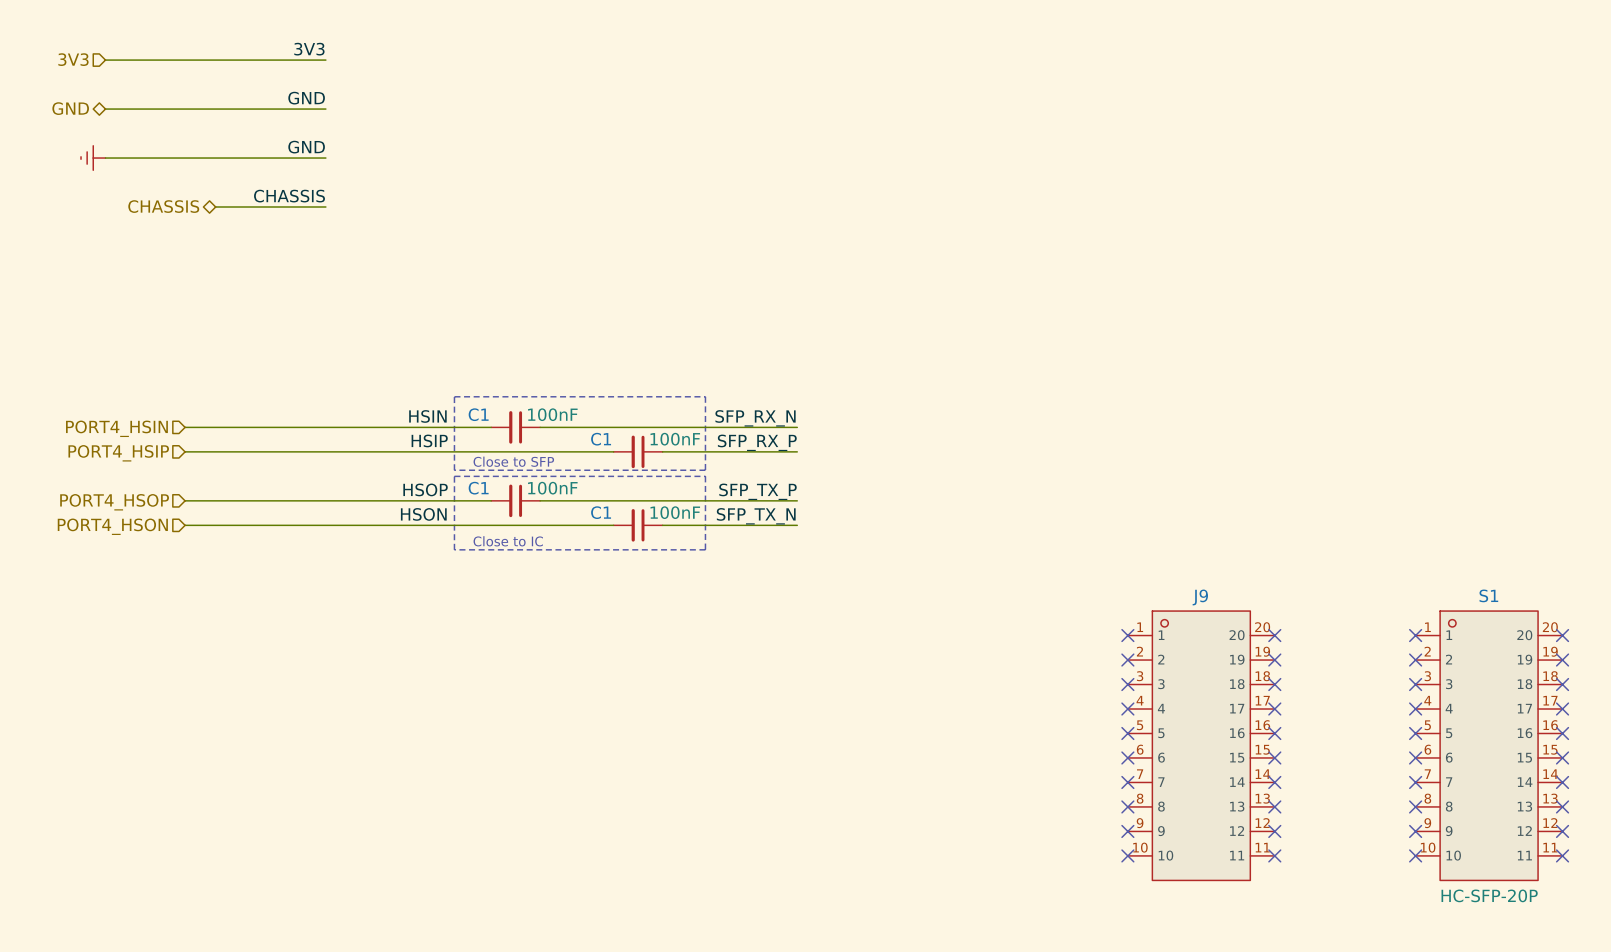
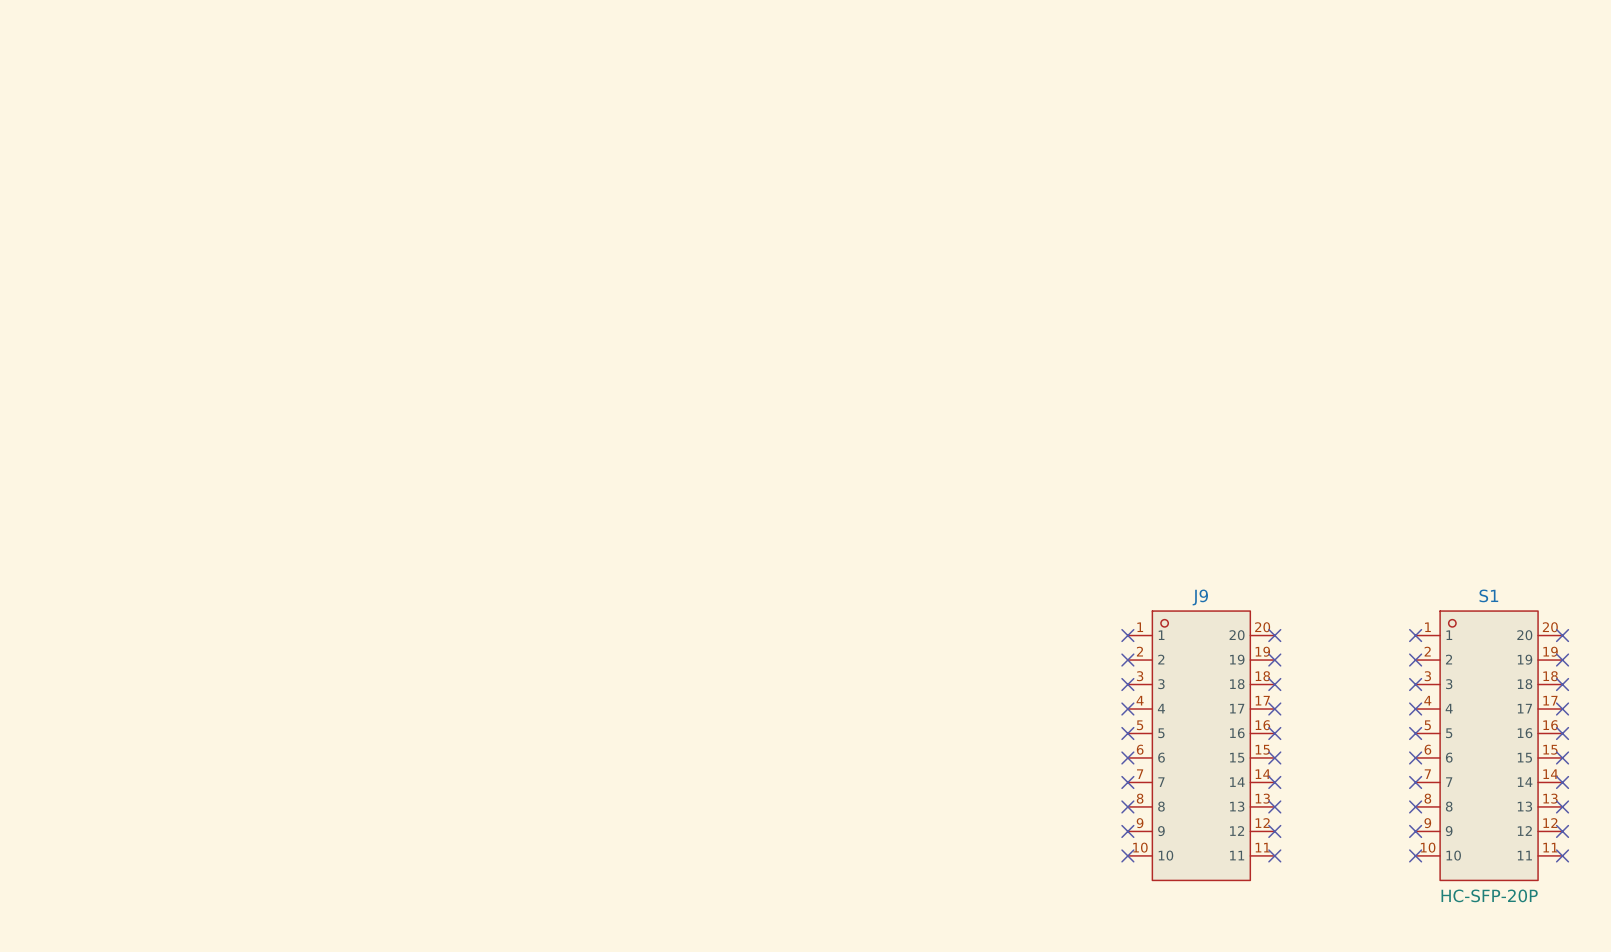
label: 3V3 (309, 49) -> none
hierarchical label: 3V3 (73, 59) -> none
wire: (105, 60) (325, 60) -> none
label: GND (306, 98) -> none
hierarchical label: GND (70, 108) -> none
wire: (105, 109) (325, 109) -> none
label: GND (306, 147) -> none
power symbol: (93, 158) -> none
wire: (105, 158) (325, 158) -> none
label: CHASSIS (289, 196) -> none
hierarchical label: CHASSIS (163, 206) -> none
wire: (215, 207) (325, 207) -> none
line: (454, 396) (454, 470) (705, 470) (705, 396) (454, 396) -> none
label: HSIN (427, 416) -> none
label: SFP_RX_N (755, 418) -> none
wire: (185, 427) (491, 427) -> none
C1: 100nF (515, 427) -> none
wire: (540, 427) (797, 427) -> none
hierarchical label: PORT4_HSIN (116, 428) -> none
label: HSIP (429, 440) -> none
label: SFP_RX_P (757, 442) -> none
wire: (185, 451) (613, 451) -> none
C1: 100nF (638, 451) -> none
wire: (662, 451) (797, 451) -> none
hierarchical label: PORT4_HSIP (118, 453) -> none
text: Close to SFP (513, 461) -> none
line: (454, 476) (705, 476) (705, 549) (454, 549) (454, 476) -> none
label: HSOP (425, 489) -> none
label: SFP_TX_P (757, 491) -> none
wire: (185, 500) (491, 500) -> none
C1: 100nF (515, 500) -> none
wire: (540, 500) (797, 500) -> none
hierarchical label: PORT4_HSOP (114, 502) -> none
label: HSON (423, 514) -> none
label: SFP_TX_N (756, 516) -> none
wire: (185, 525) (613, 525) -> none
C1: 100nF (638, 525) -> none
wire: (662, 525) (797, 525) -> none
hierarchical label: PORT4_HSON (112, 526) -> none
text: Close to IC (508, 541) -> none

